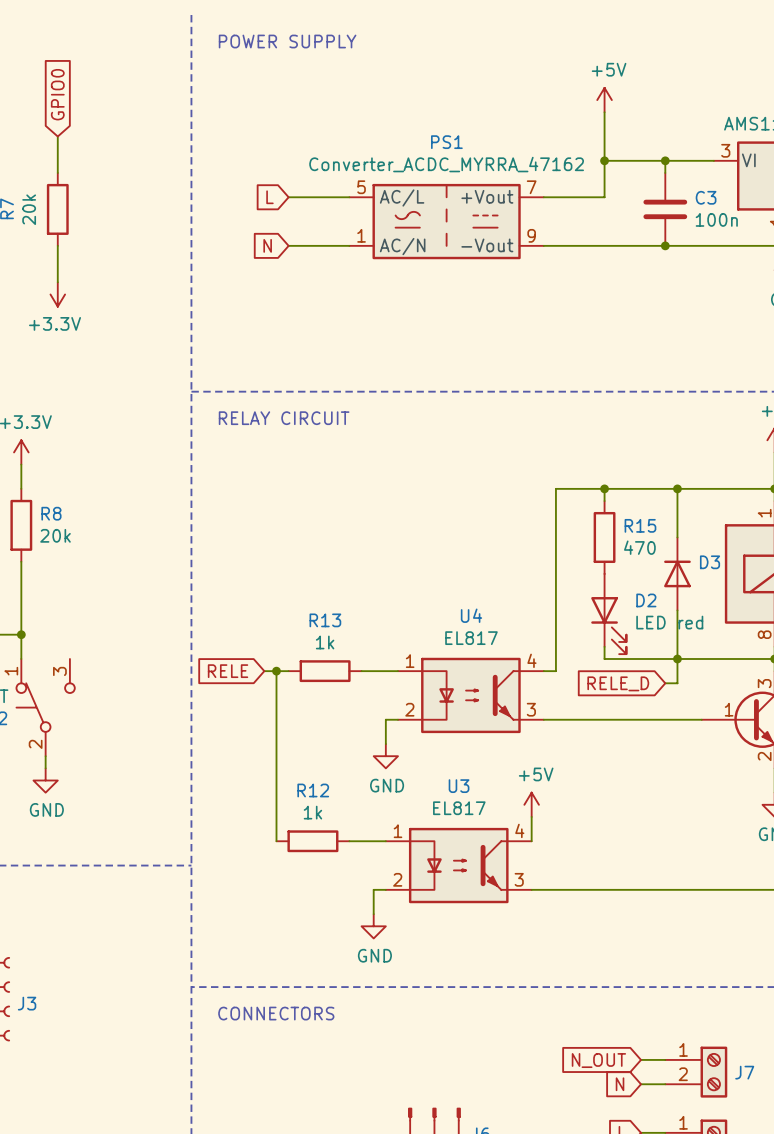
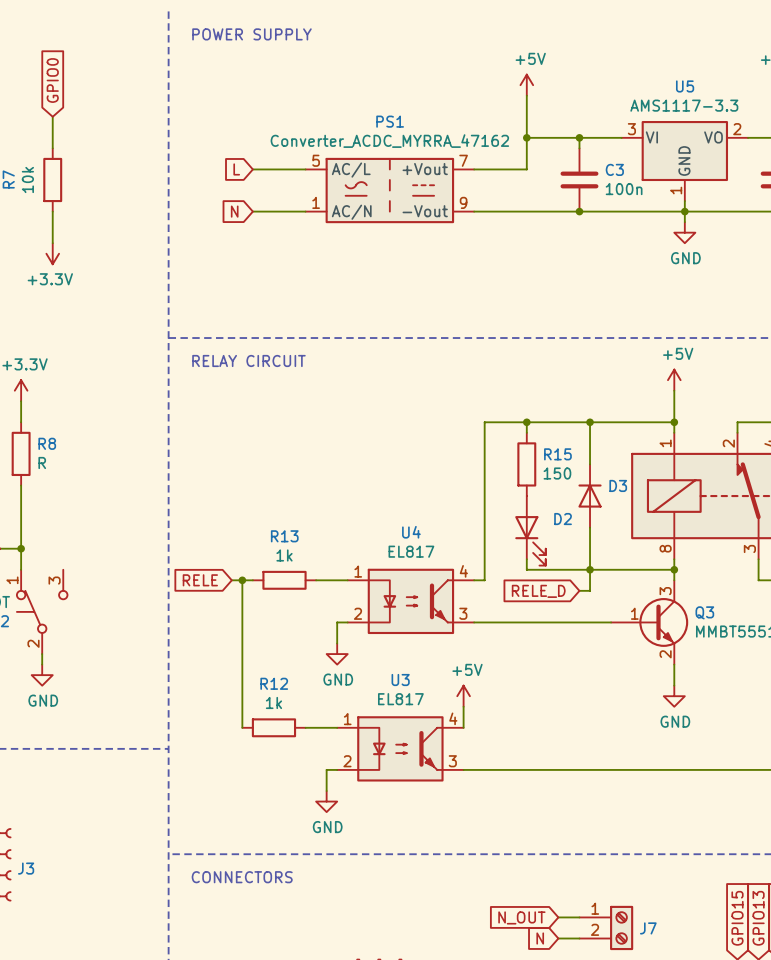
R7 value: 20k (29, 209) -> 10k (27, 179)
R8 value: 20k (55, 535) -> R (42, 462)
R15 value: 470 (639, 547) -> 150 (557, 473)
D2 value: LED red (669, 622) -> none

